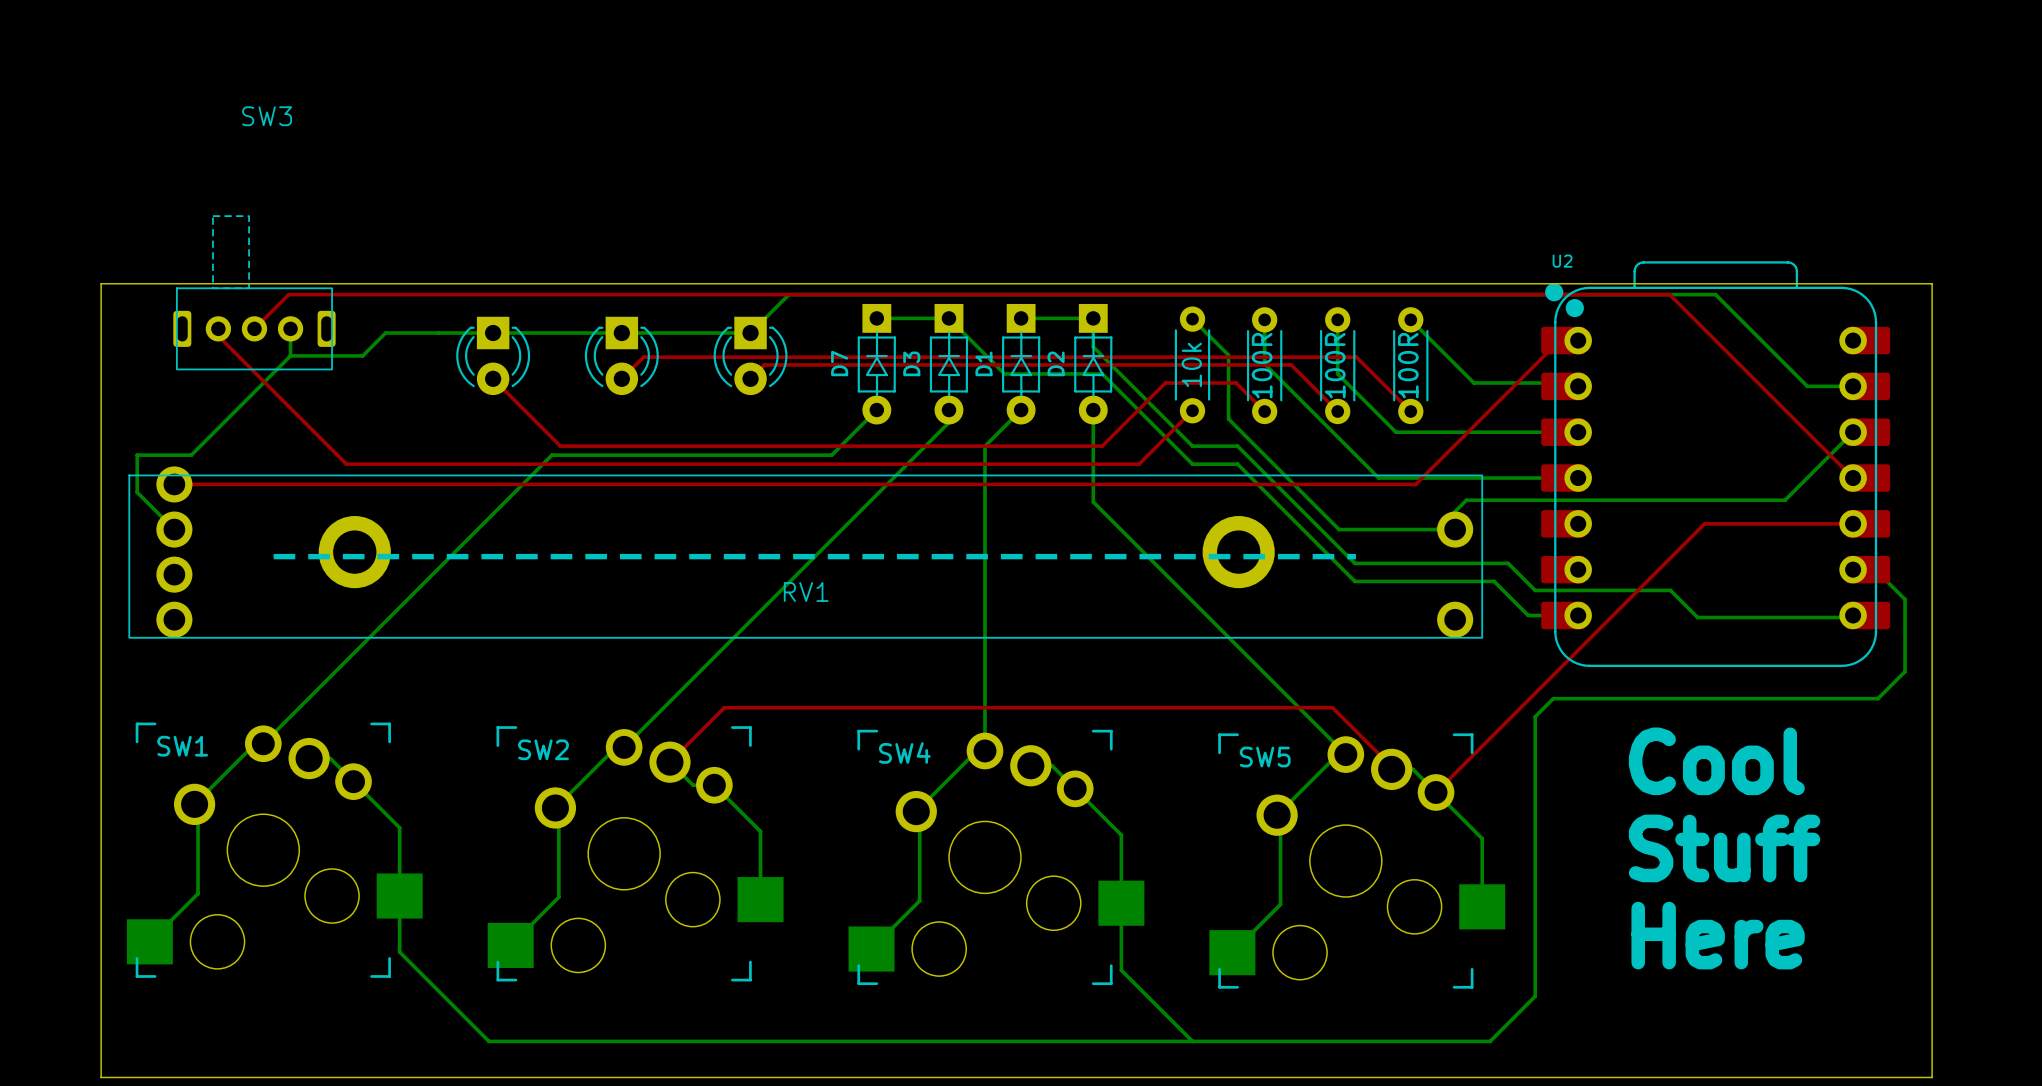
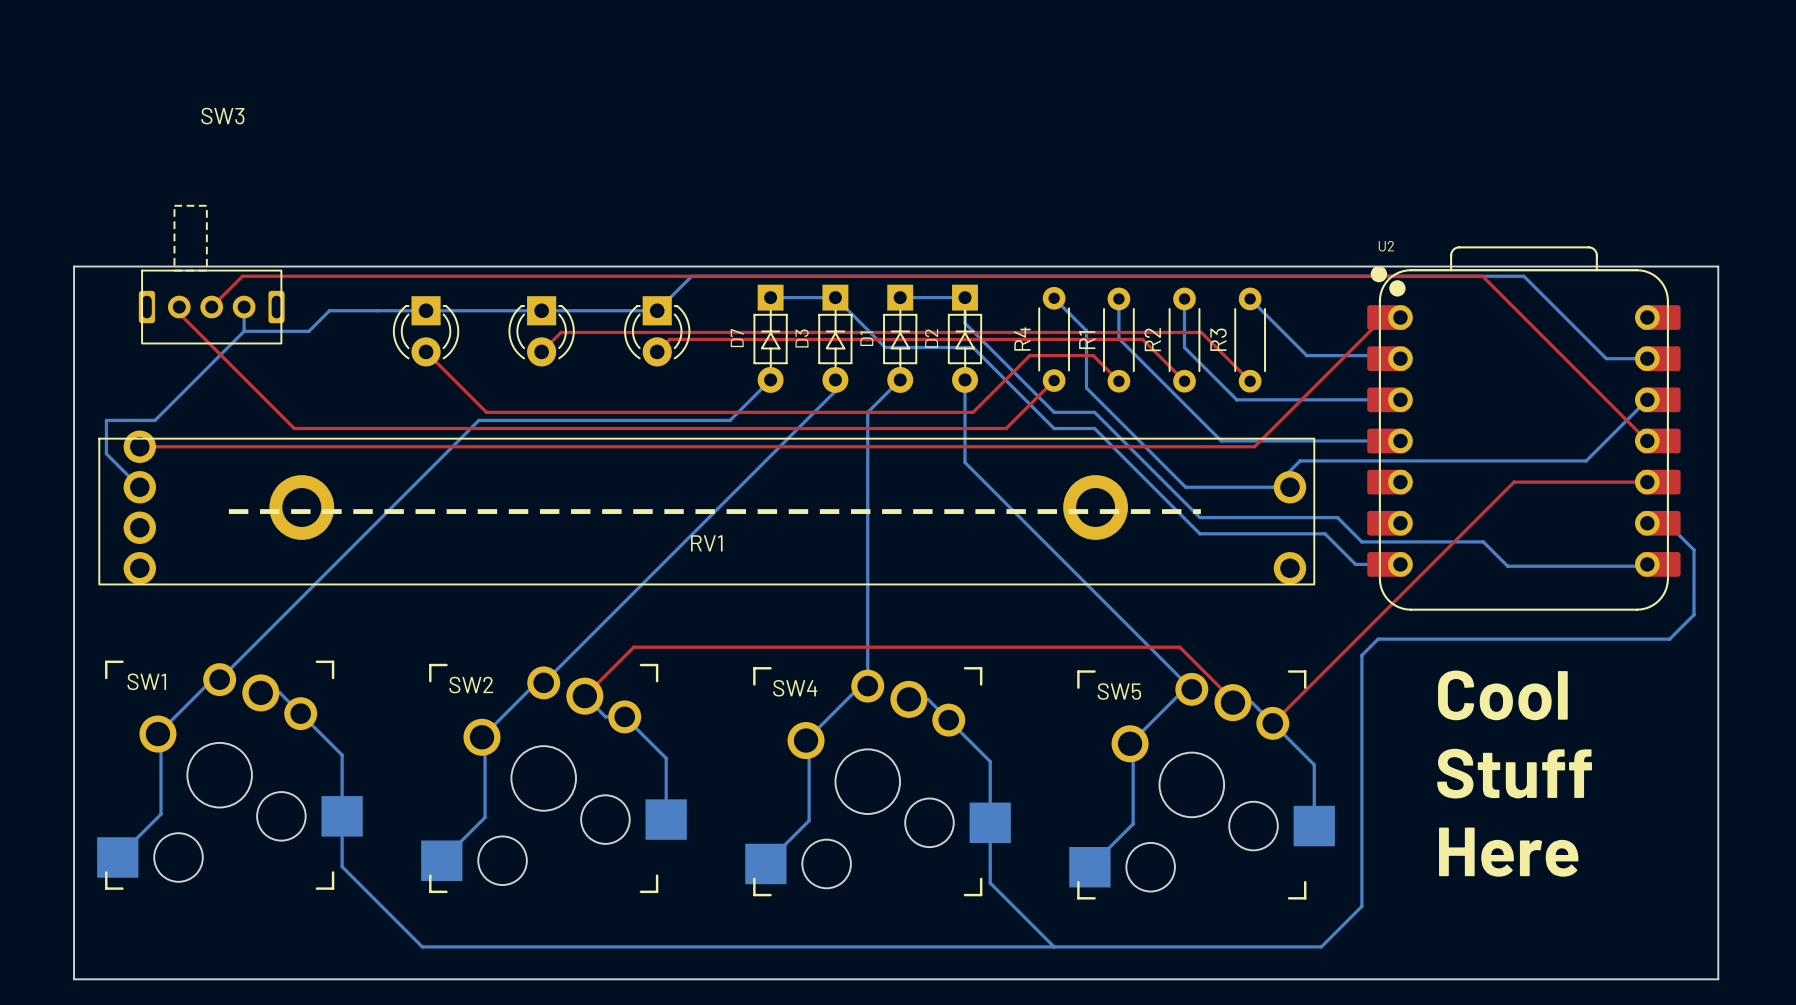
10k name: 10k (1191, 364) -> R4 (1022, 339)
100R name: 100R (1262, 365) -> R1 (1087, 340)
100R name: 100R (1335, 365) -> R2 (1152, 339)
100R name: 100R (1408, 365) -> R3 (1218, 339)

